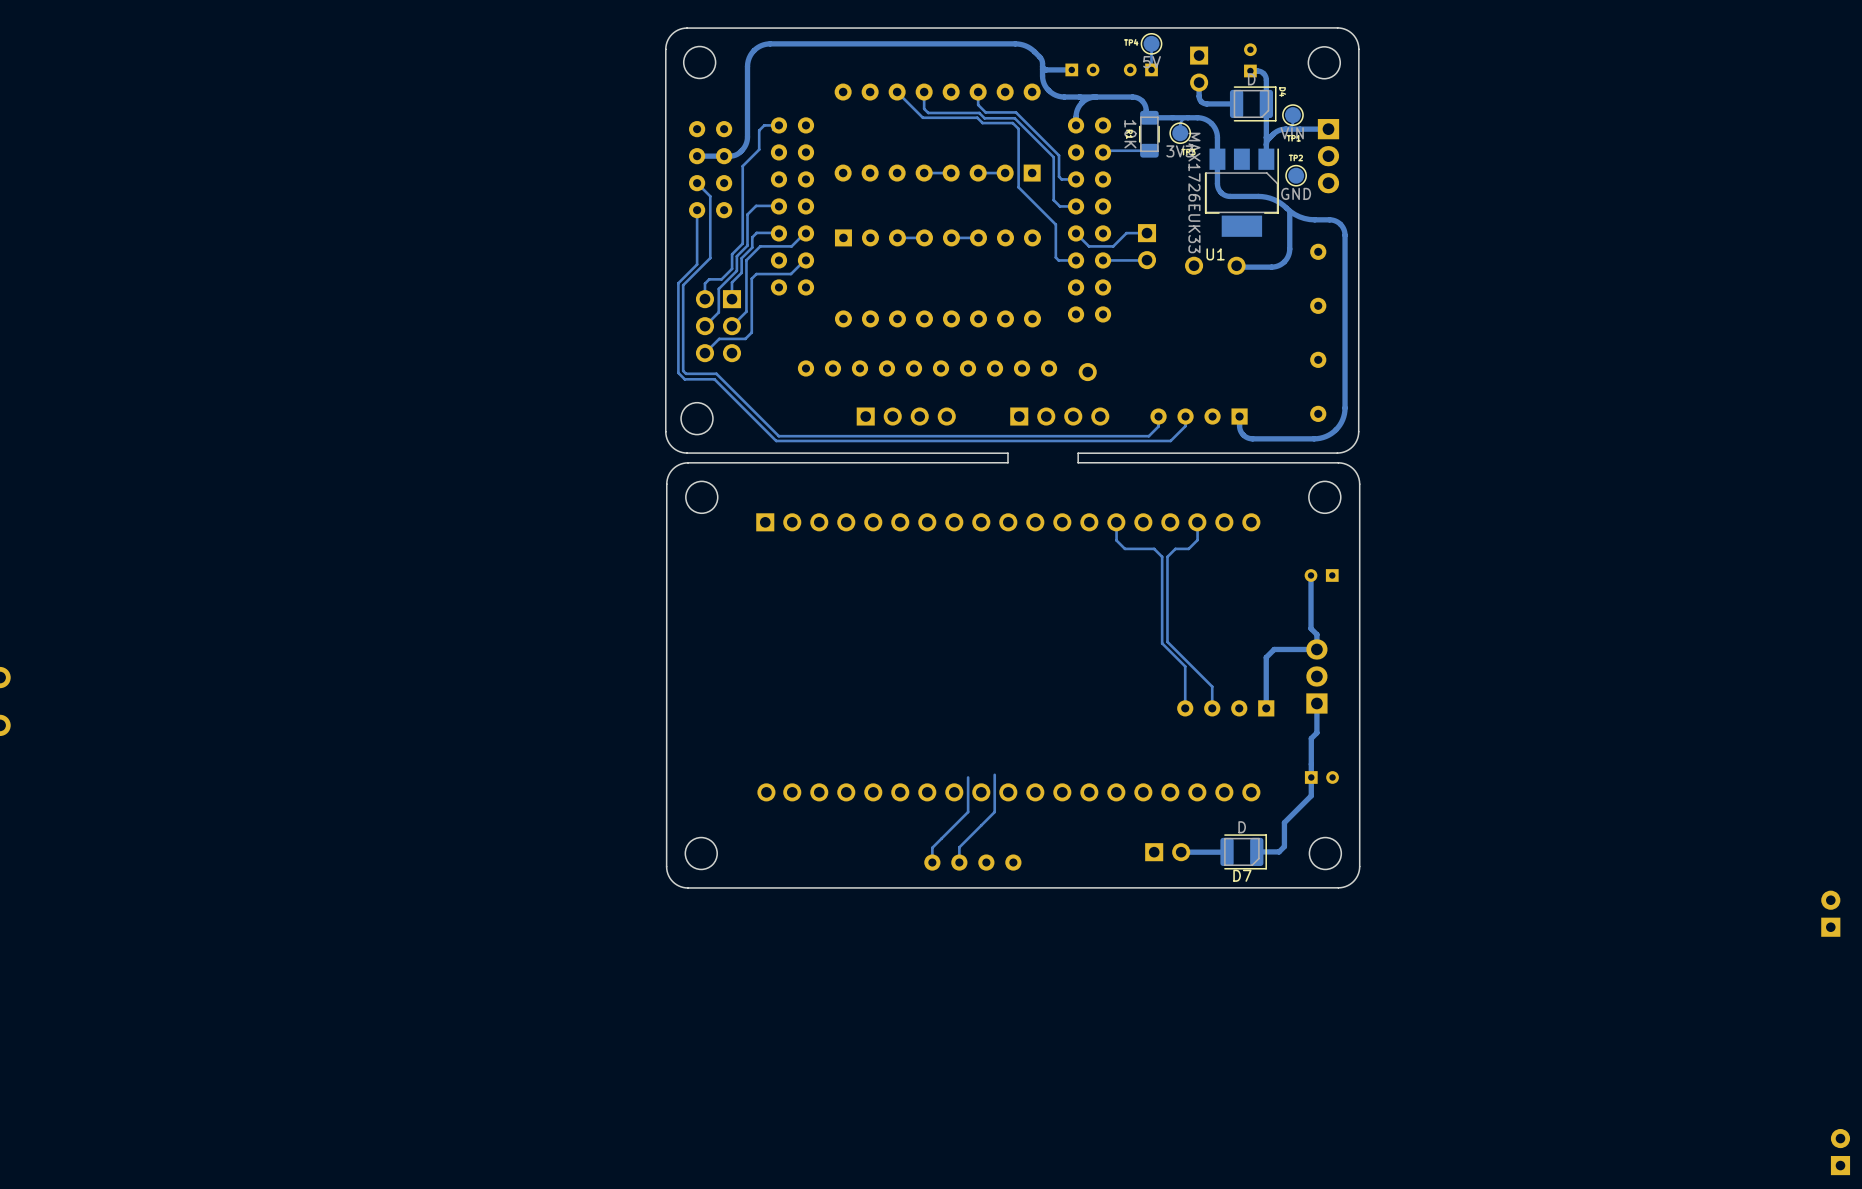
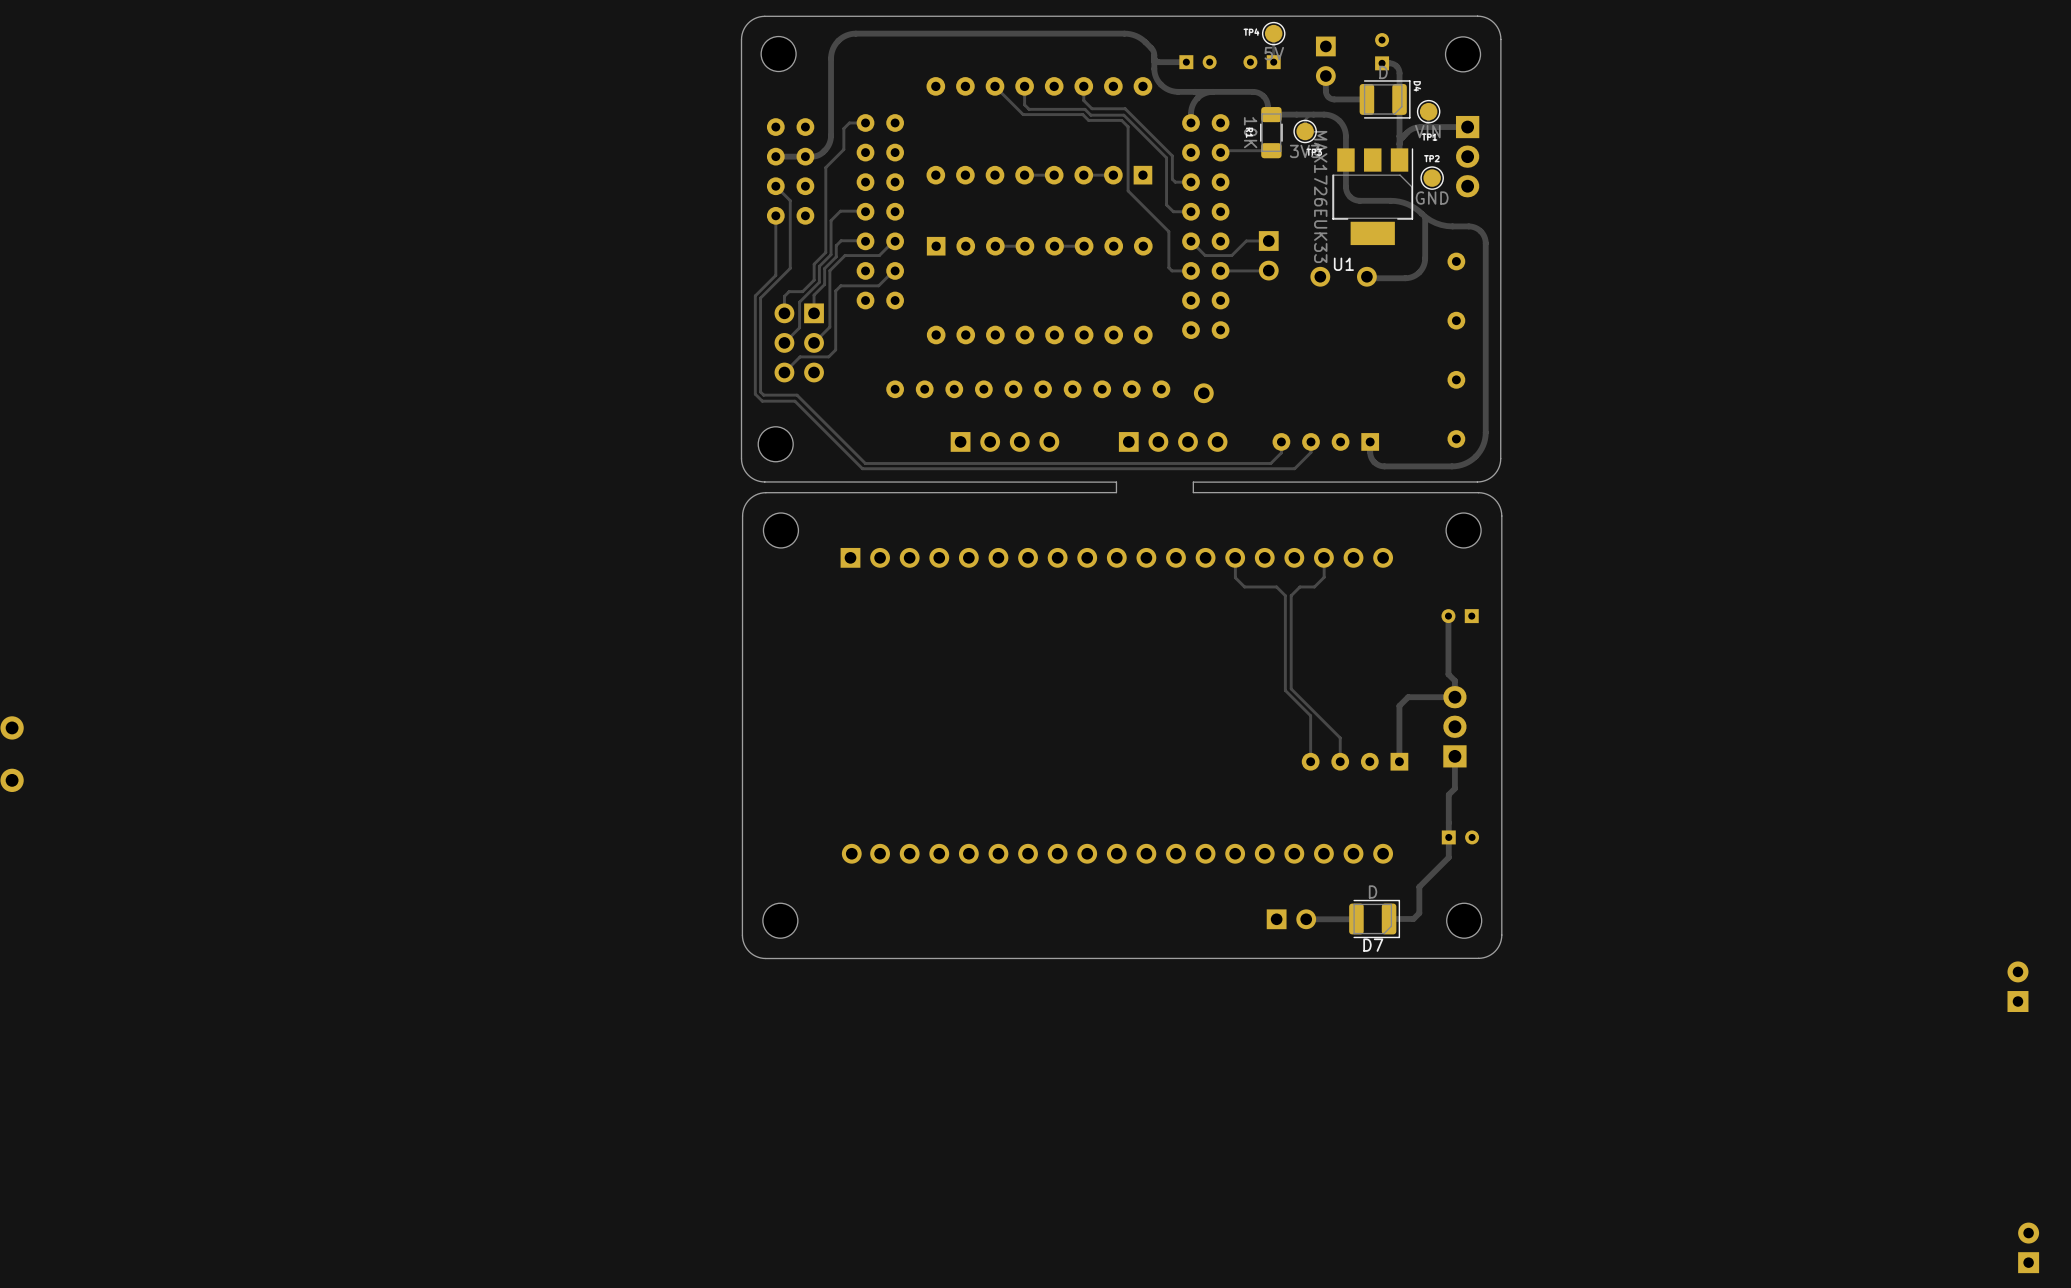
track: (994, 774) (994, 812) (959, 847) (959, 862) -> none
track: (968, 777) (968, 812) (932, 847) (932, 862) -> none
part: (972, 862) -> none

